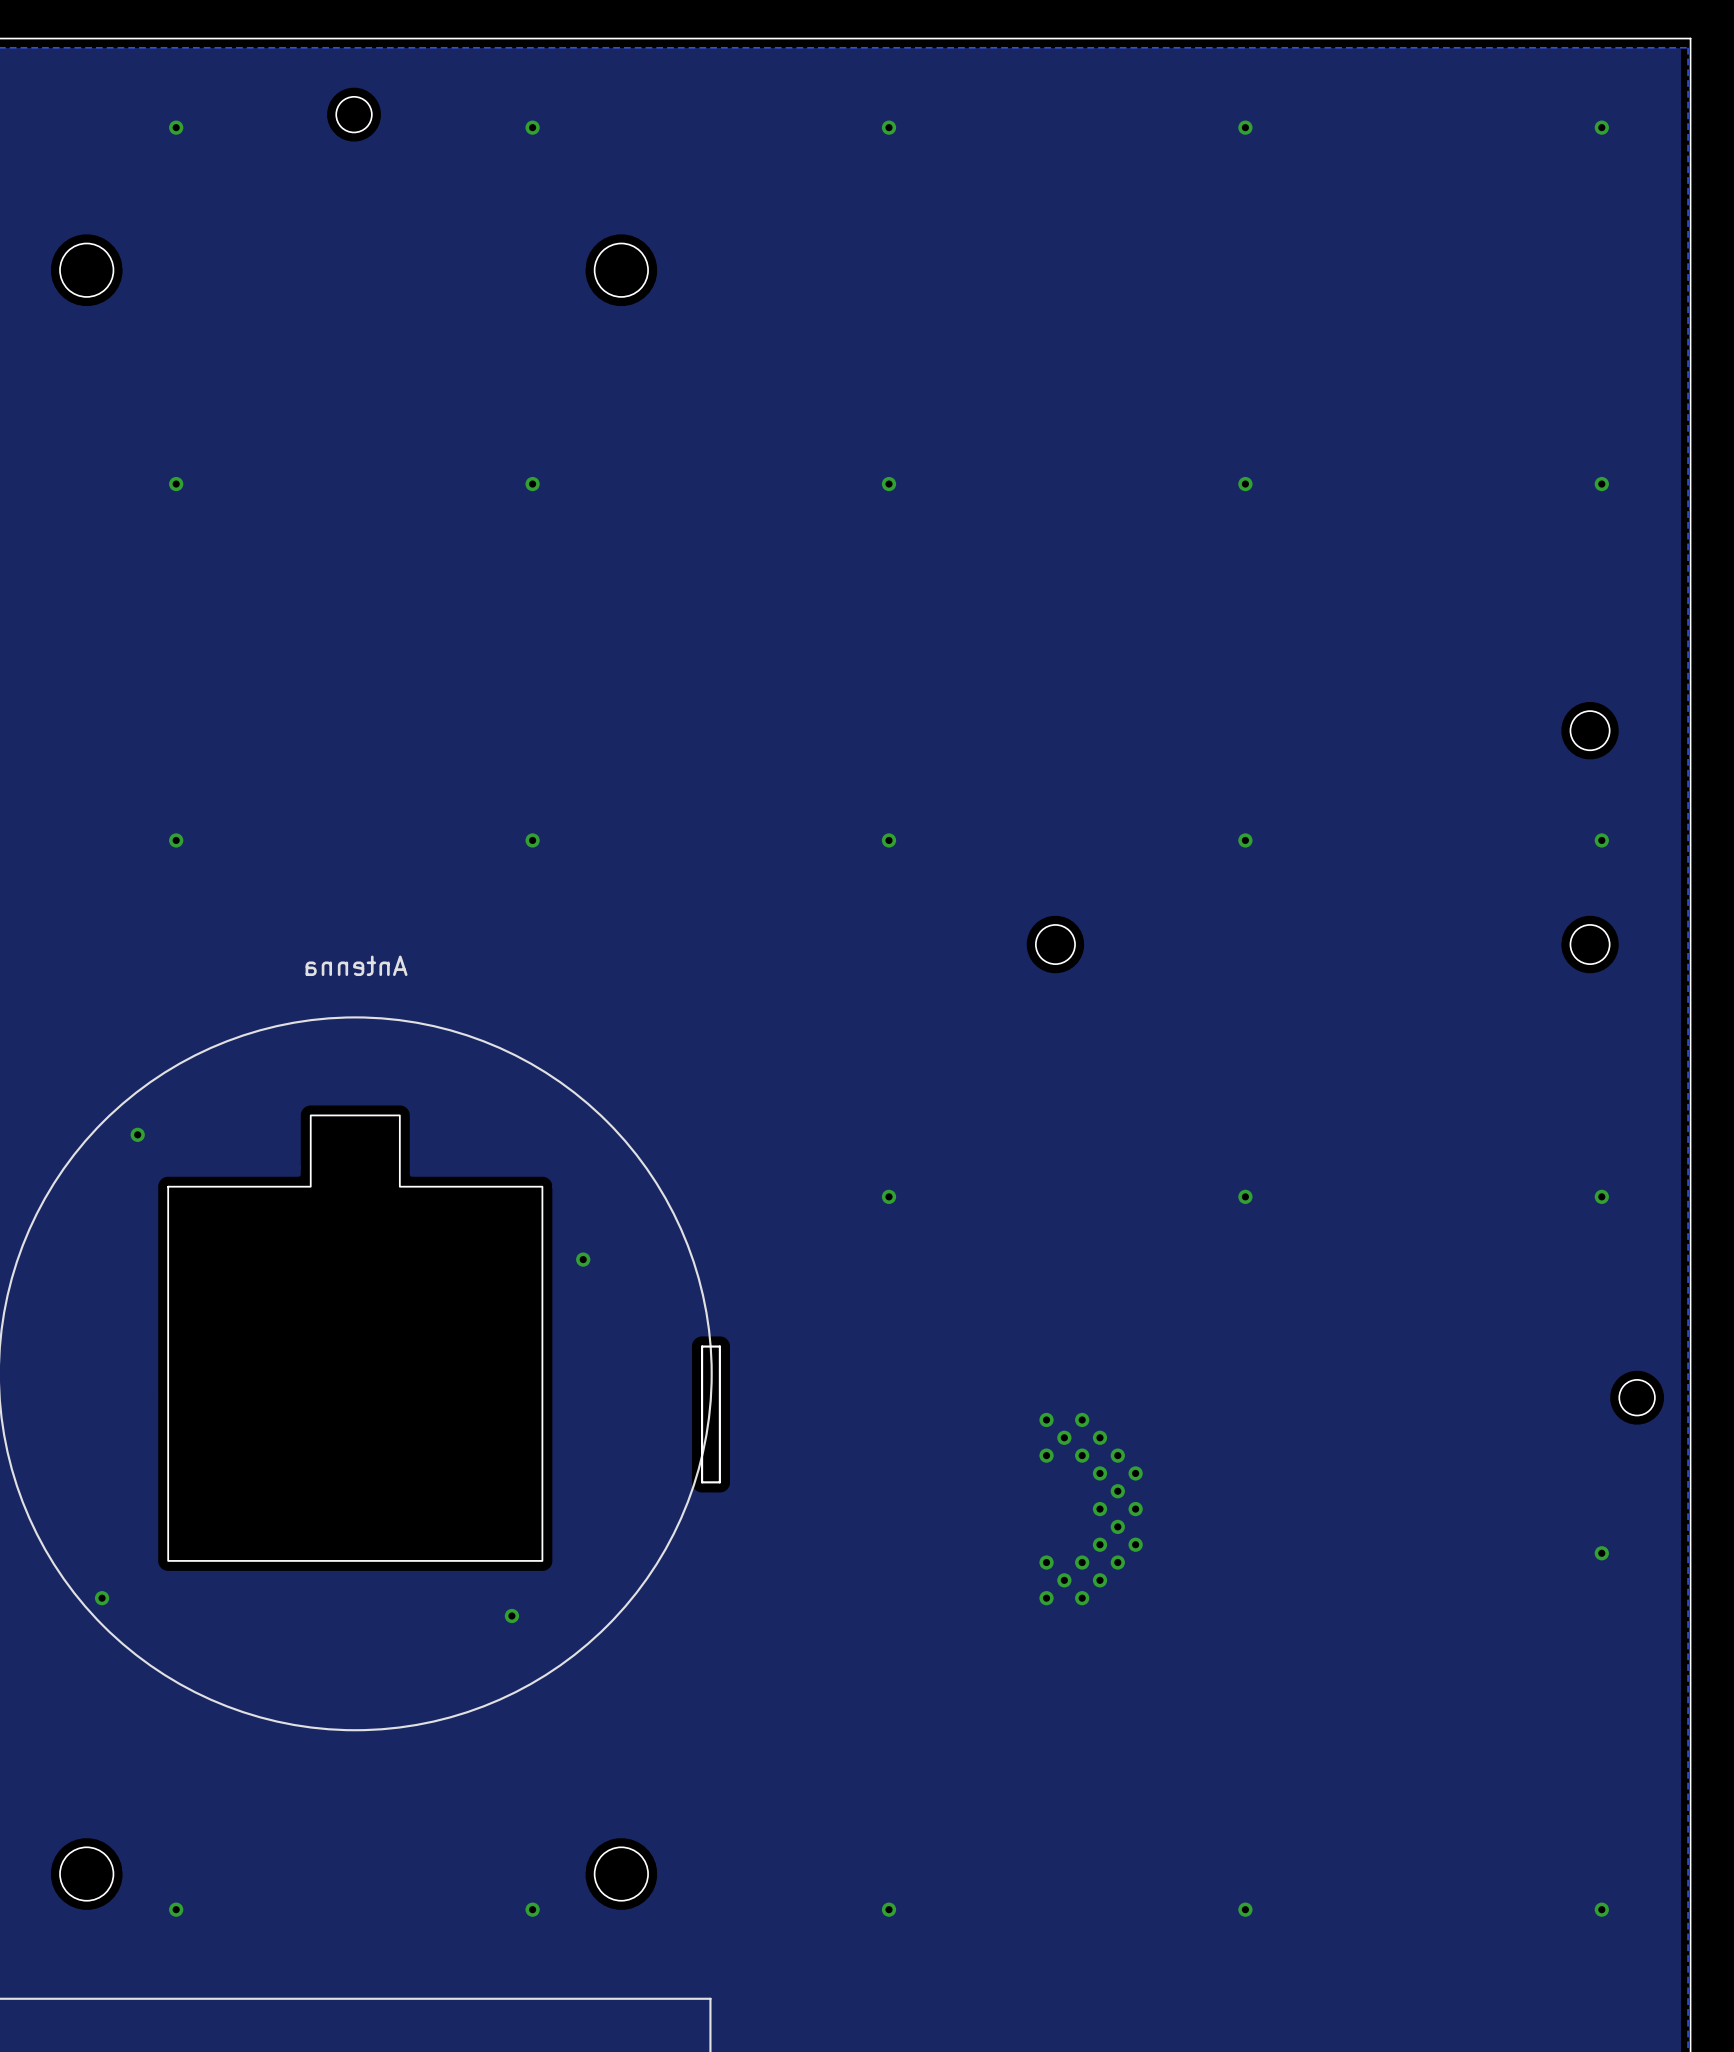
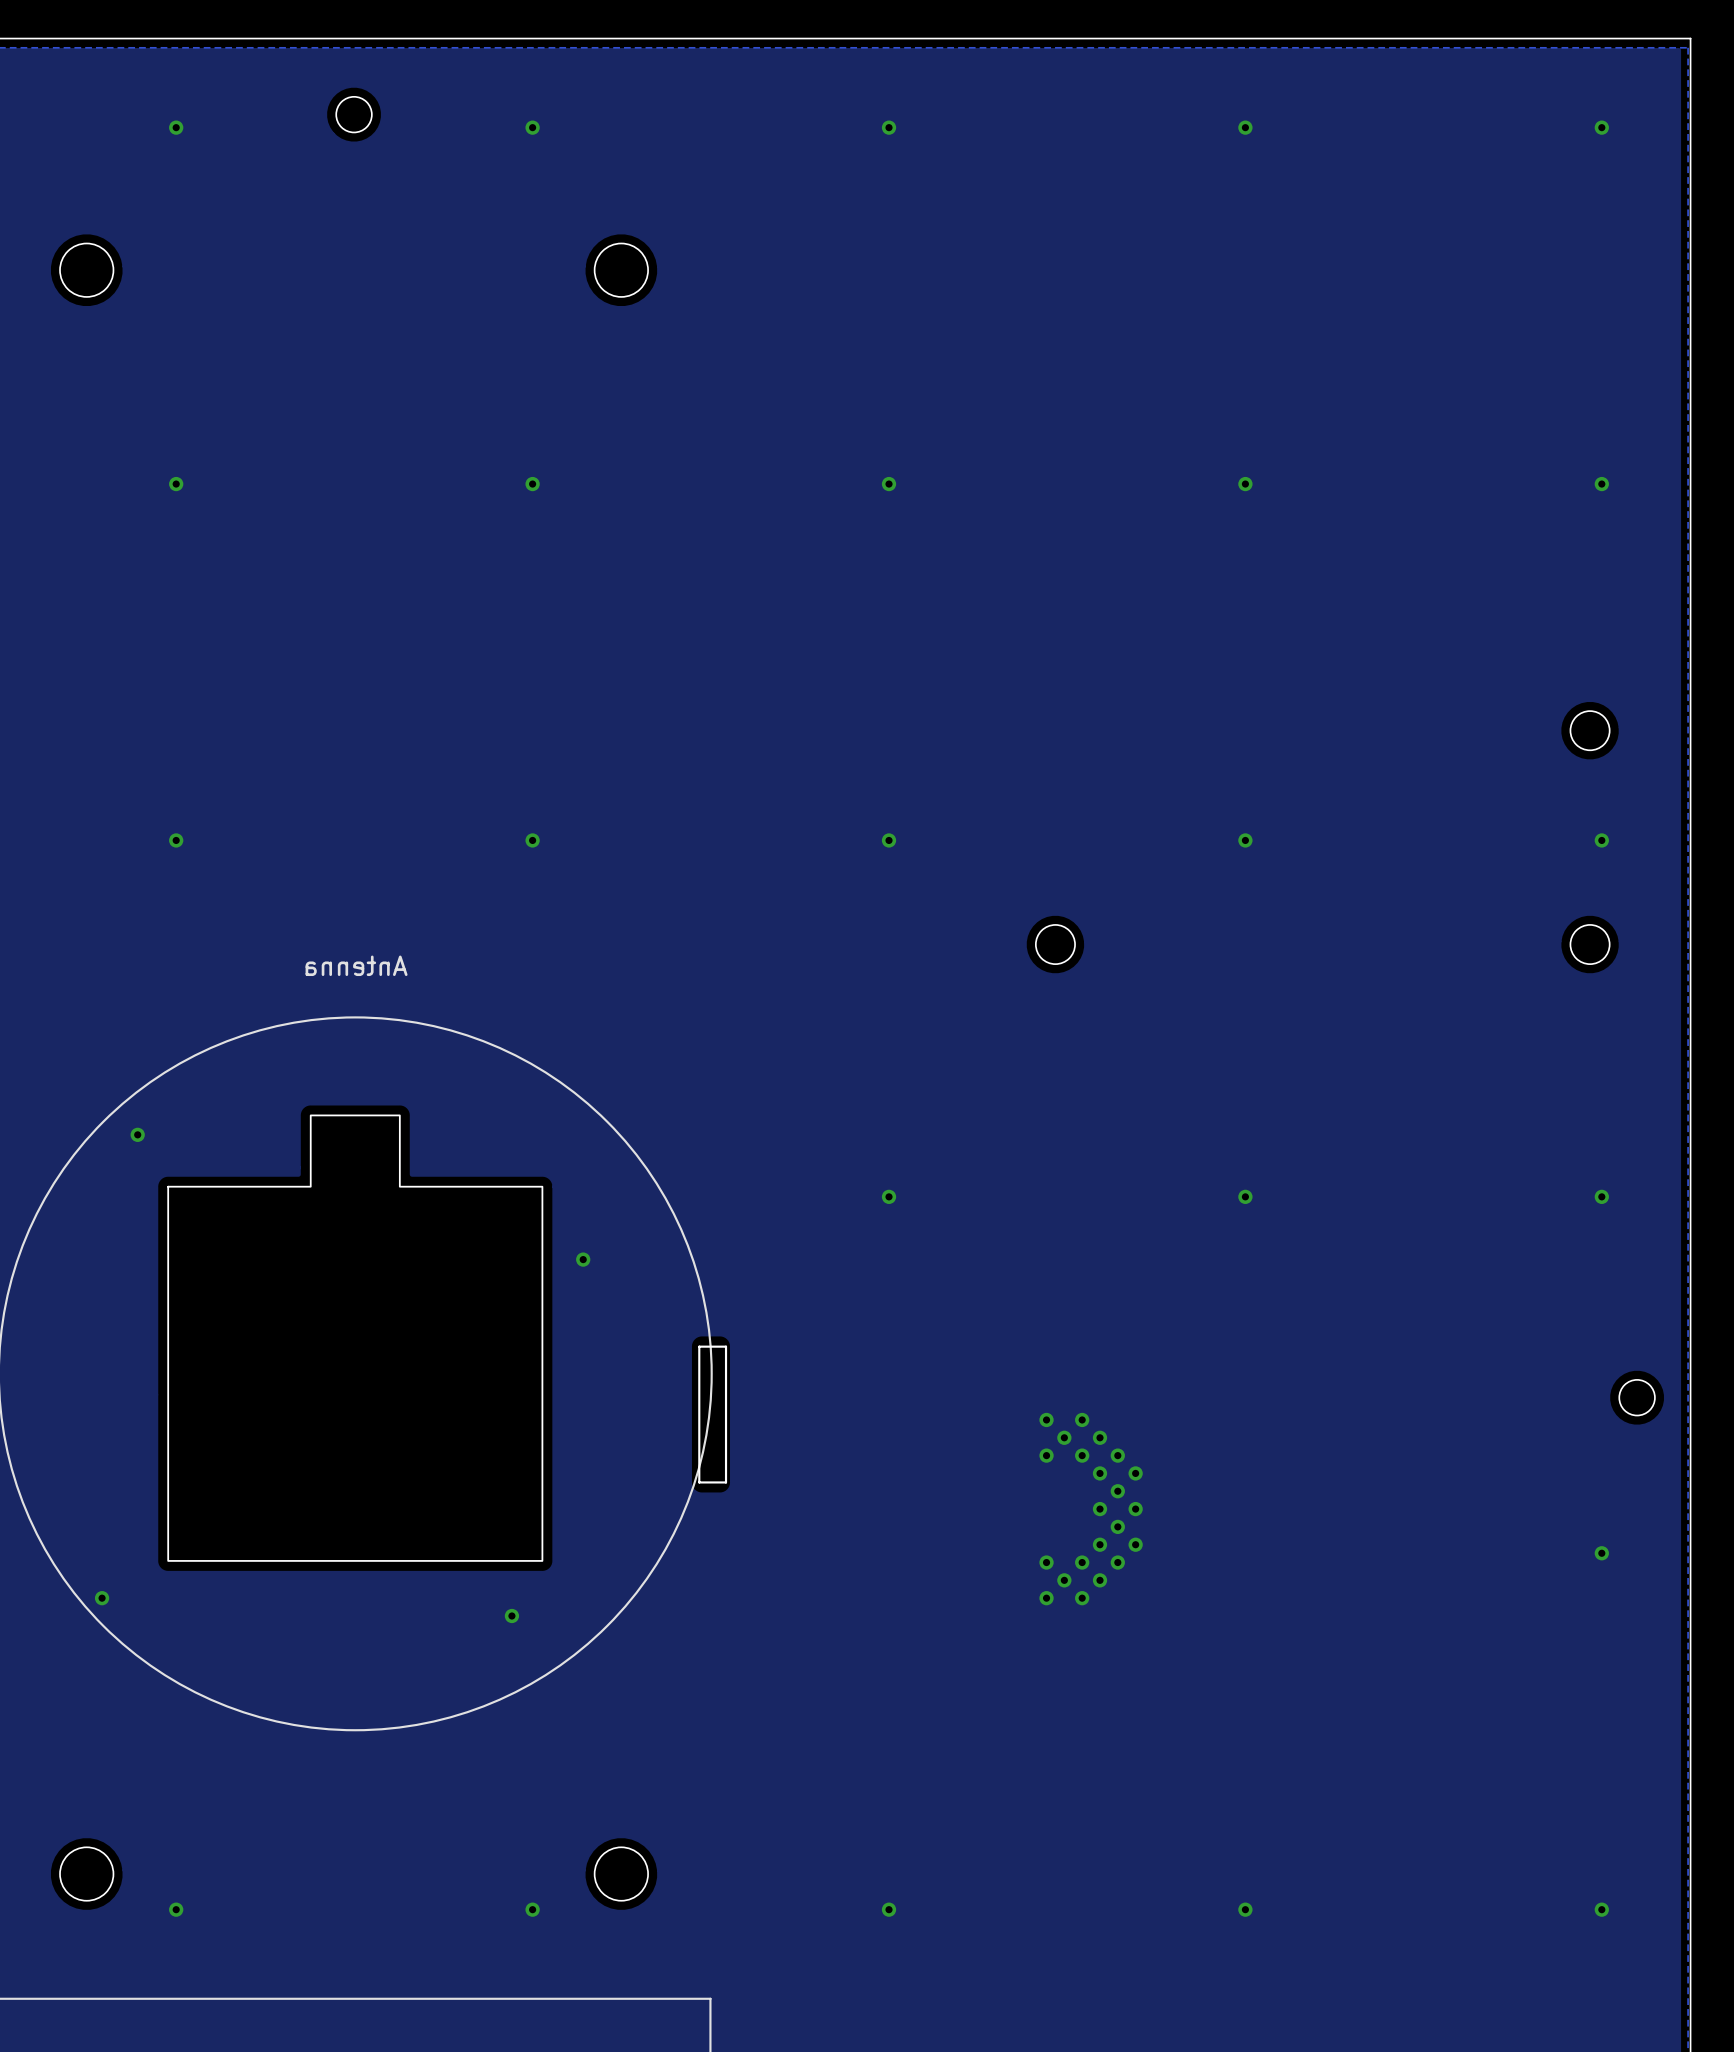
drawing shape: [701, 1345, 721, 1484] -> [698, 1345, 728, 1484]

